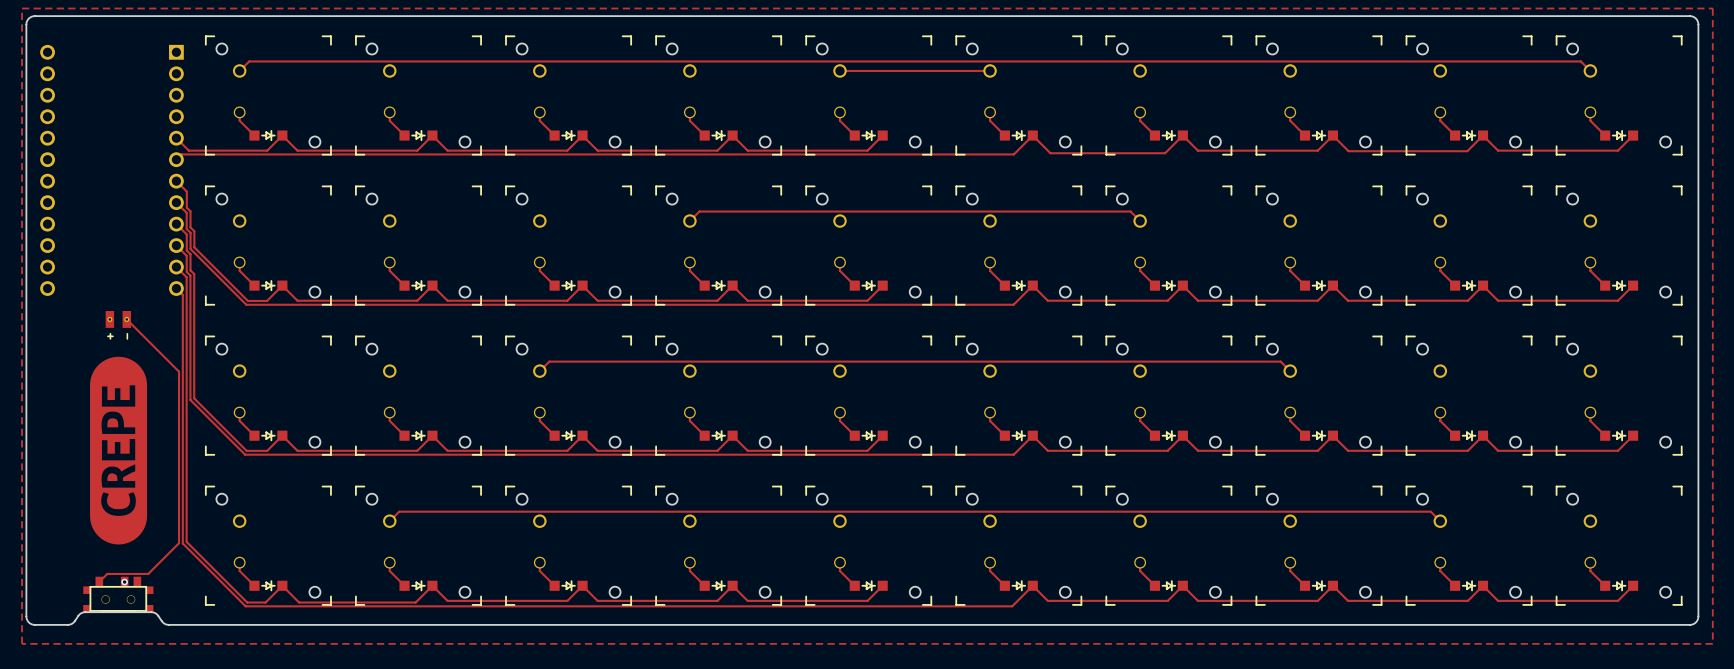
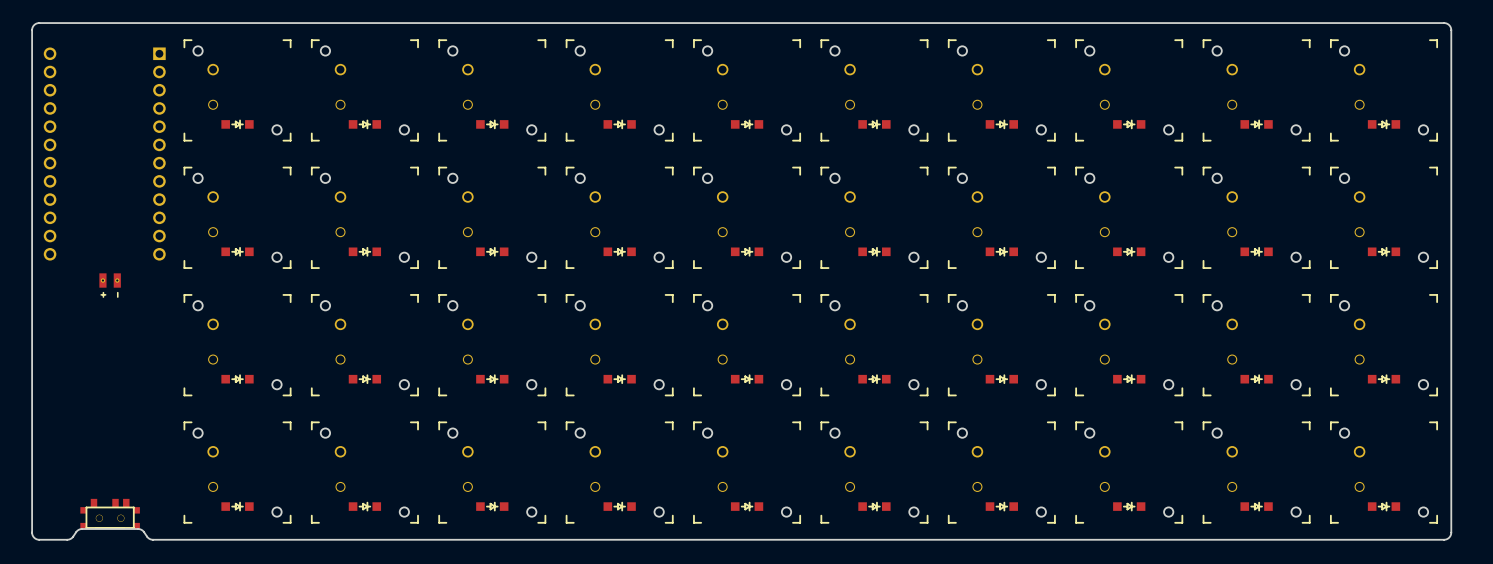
zone outline: (22, 8) (22, 643) (1712, 643) (1712, 8) (22, 8) -> none
track: (239, 70) (249, 61) (1580, 61) (1590, 70) -> none
track: (839, 70) (990, 70) -> none
track: (239, 112) (239, 120) (254, 135) -> none
track: (389, 112) (389, 120) (404, 135) -> none
track: (539, 112) (539, 120) (554, 135) -> none
track: (689, 112) (689, 120) (704, 135) -> none
track: (839, 112) (839, 120) (854, 135) -> none
track: (990, 112) (990, 120) (1004, 135) -> none
track: (1140, 112) (1140, 120) (1154, 135) -> none
track: (1290, 112) (1290, 120) (1305, 135) -> none
track: (1440, 112) (1440, 120) (1455, 135) -> none
track: (1590, 112) (1590, 120) (1605, 135) -> none
track: (882, 135) (867, 150) (747, 150) (732, 135) (717, 150) (597, 150) (582, 135) (567, 150) (447, 150) (432, 135) (417, 150) (297, 150) (282, 135) (267, 150) (188, 150) (176, 138) -> none
track: (1633, 135) (1617, 150) (1498, 150) (1483, 135) (1467, 151) (1348, 151) (1332, 135) (1317, 150) (1197, 150) (1182, 135) (1165, 153) (1050, 153) (1032, 135) (1013, 154) (181, 154) (176, 159) -> none
track: (176, 181) (186, 191) (186, 207) (190, 211) (190, 227) (194, 231) (194, 247) (247, 300) (267, 300) (282, 285) (297, 300) (417, 300) (432, 285) (447, 300) (567, 300) (582, 285) (597, 300) (717, 300) (732, 285) (747, 300) (867, 300) (882, 285) -> none
track: (176, 202) (186, 212) (186, 229) (190, 232) (190, 248) (246, 304) (1013, 304) (1032, 285) (1047, 300) (1167, 300) (1182, 285) (1197, 300) (1317, 300) (1332, 285) (1348, 300) (1467, 300) (1483, 285) (1498, 300) (1617, 300) (1633, 285) -> none
track: (689, 221) (699, 211) (1130, 211) (1140, 221) -> none
track: (176, 224) (186, 234) (186, 250) (190, 254) (190, 270) (194, 274) (194, 398) (246, 450) (267, 450) (282, 435) (297, 450) (417, 450) (432, 435) (447, 450) (567, 450) (582, 435) (597, 450) (717, 450) (732, 435) (747, 450) (867, 450) (882, 435) -> none
track: (176, 245) (186, 255) (186, 271) (190, 275) (190, 399) (245, 454) (1013, 454) (1032, 435) (1047, 450) (1167, 450) (1182, 435) (1197, 450) (1317, 450) (1332, 435) (1348, 450) (1467, 450) (1483, 435) (1498, 450) (1617, 450) (1633, 435) -> none
track: (239, 262) (239, 270) (254, 285) -> none
track: (389, 262) (389, 270) (404, 285) -> none
track: (539, 262) (539, 270) (554, 285) -> none
track: (689, 262) (689, 270) (704, 285) -> none
track: (839, 262) (839, 270) (854, 285) -> none
track: (990, 262) (990, 270) (1004, 285) -> none
track: (1140, 262) (1140, 270) (1154, 285) -> none
track: (1290, 262) (1290, 270) (1305, 285) -> none
track: (1440, 262) (1440, 270) (1455, 285) -> none
track: (1590, 262) (1590, 270) (1605, 285) -> none
track: (176, 267) (186, 277) (186, 541) (247, 602) (265, 602) (282, 585) (299, 602) (415, 602) (432, 585) (447, 600) (567, 600) (582, 585) (597, 600) (717, 600) (732, 585) (747, 600) (867, 600) (882, 585) -> none
track: (176, 288) (182, 294) (182, 543) (245, 606) (1012, 606) (1032, 585) (1047, 600) (1167, 600) (1182, 585) (1197, 600) (1317, 600) (1332, 585) (1348, 600) (1467, 600) (1483, 585) (1498, 600) (1617, 600) (1633, 585) -> none
track: (126, 319) (179, 371) (179, 543) (148, 573) (107, 573) (99, 581) -> none
drawing: [90, 356, 148, 545] -> none
track: (539, 371) (549, 361) (1280, 361) (1290, 371) -> none
track: (239, 412) (239, 420) (254, 435) -> none
track: (389, 412) (389, 420) (404, 435) -> none
track: (539, 412) (539, 420) (554, 435) -> none
track: (689, 412) (689, 420) (704, 435) -> none
track: (839, 412) (839, 420) (854, 435) -> none
track: (990, 412) (990, 420) (1004, 435) -> none
track: (1140, 412) (1140, 420) (1154, 435) -> none
track: (1290, 412) (1290, 420) (1305, 435) -> none
track: (1440, 412) (1440, 420) (1455, 435) -> none
track: (1590, 412) (1590, 420) (1605, 435) -> none
track: (389, 521) (399, 511) (1430, 511) (1440, 521) -> none
track: (239, 562) (239, 570) (254, 585) -> none
track: (389, 562) (389, 571) (404, 585) -> none
track: (539, 562) (539, 570) (554, 585) -> none
track: (689, 562) (689, 570) (704, 585) -> none
track: (839, 562) (839, 570) (854, 585) -> none
track: (990, 562) (990, 570) (1004, 585) -> none
track: (1140, 562) (1140, 570) (1154, 585) -> none
track: (1290, 562) (1290, 570) (1305, 585) -> none
track: (1440, 562) (1440, 570) (1455, 585) -> none
track: (1590, 562) (1590, 570) (1605, 585) -> none
via: (124, 582) -> none

